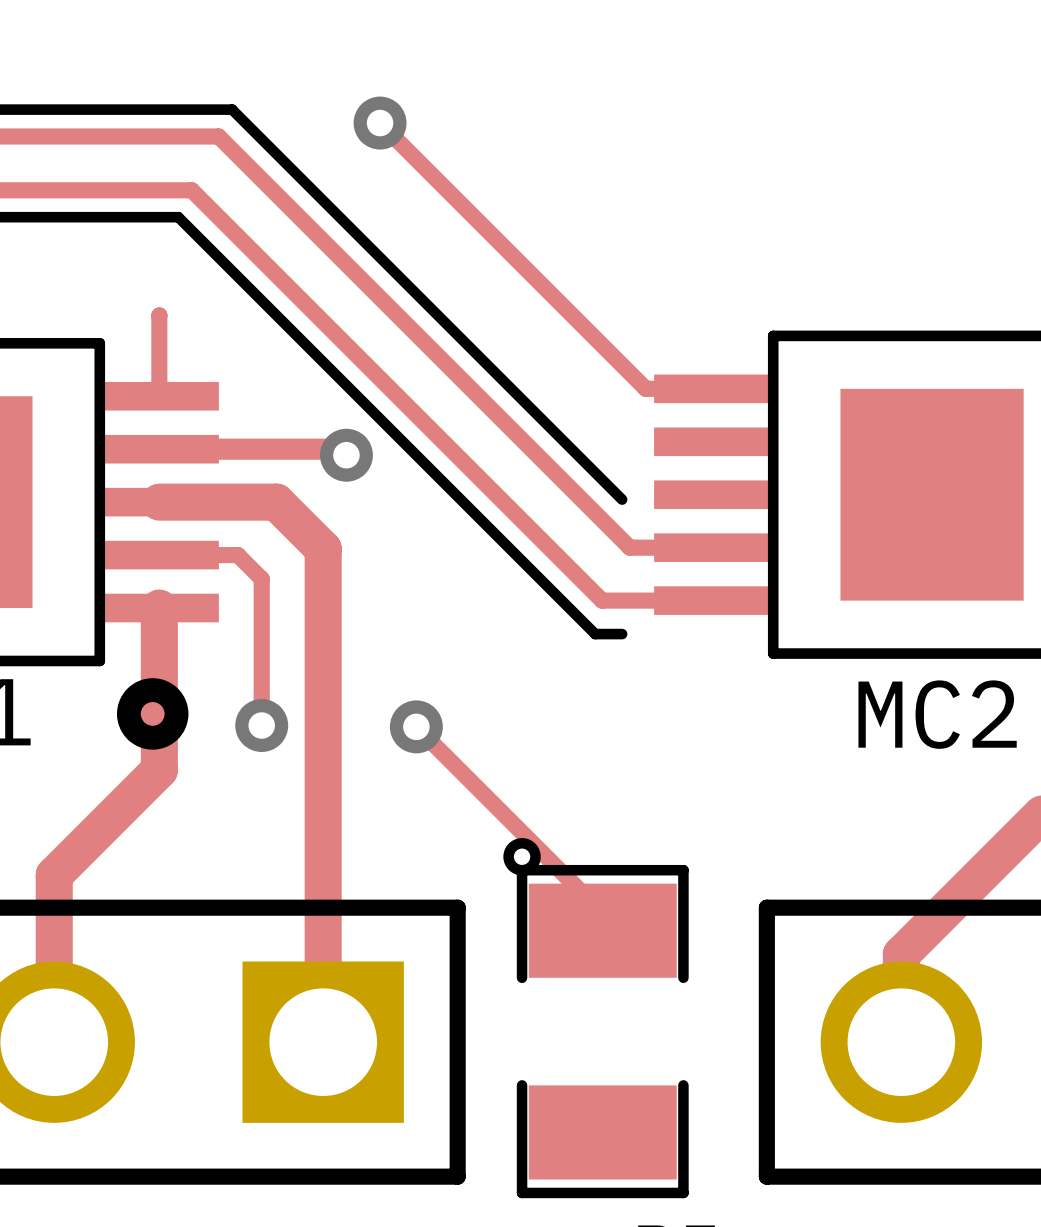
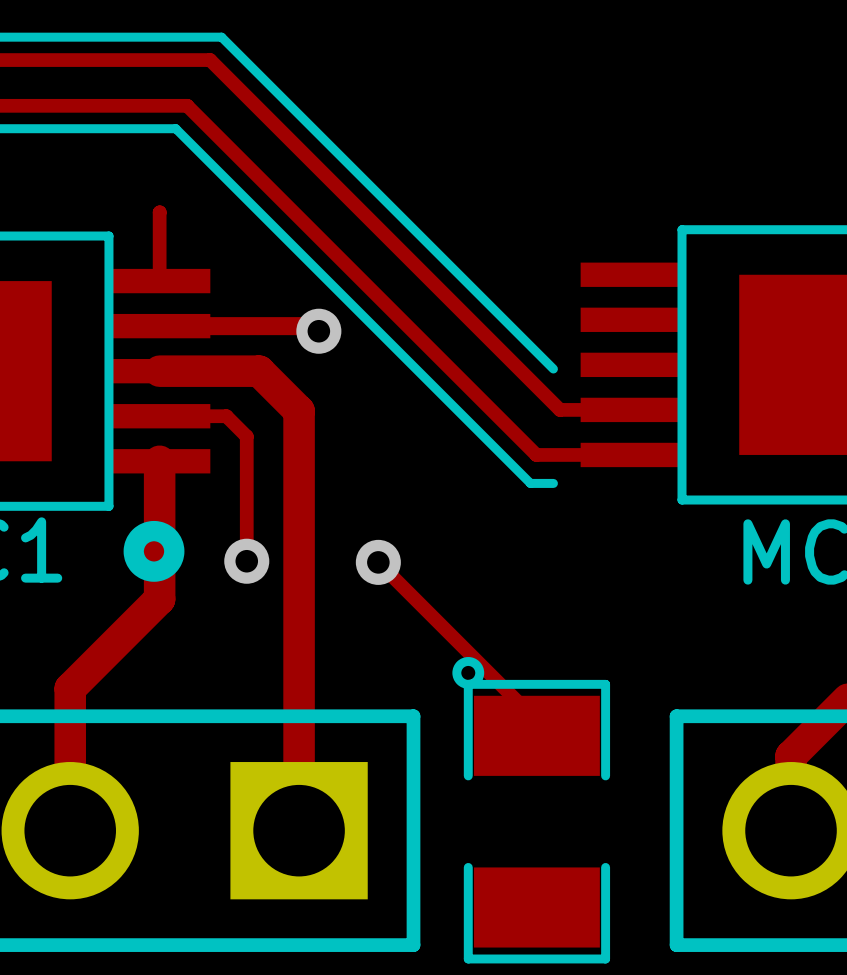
track: (380, 123) (645, 388) (713, 388) -> none
via: (380, 123) -> none

